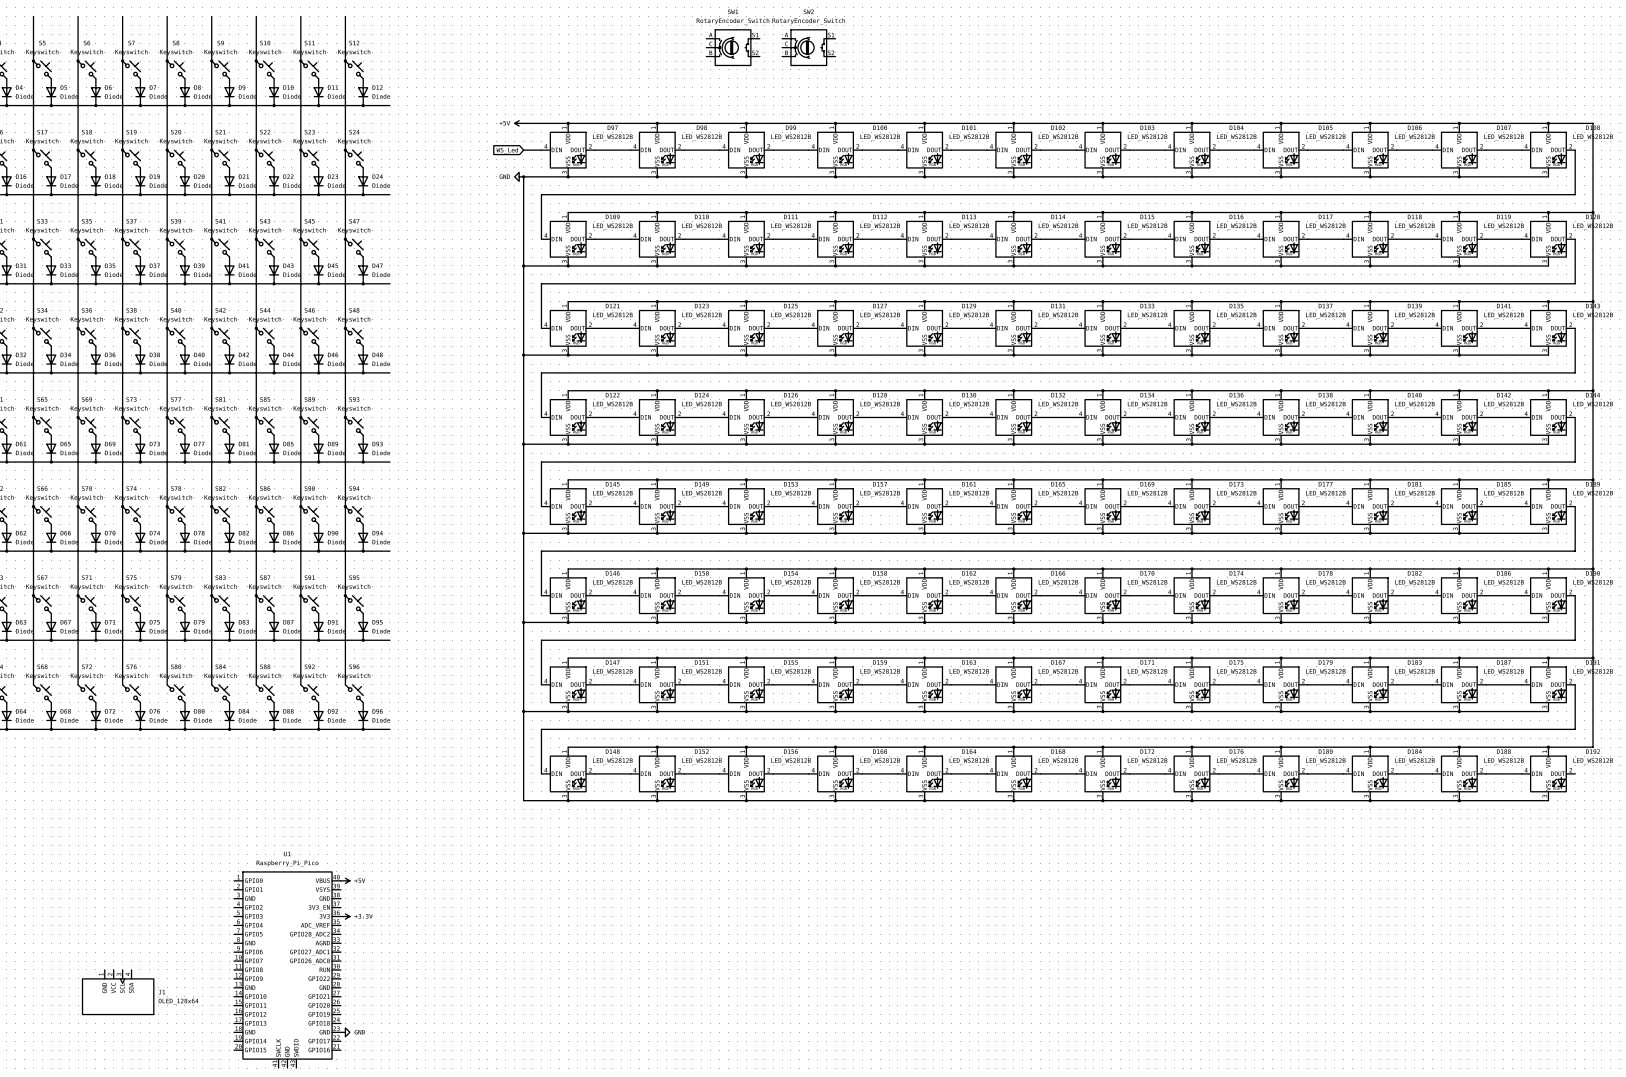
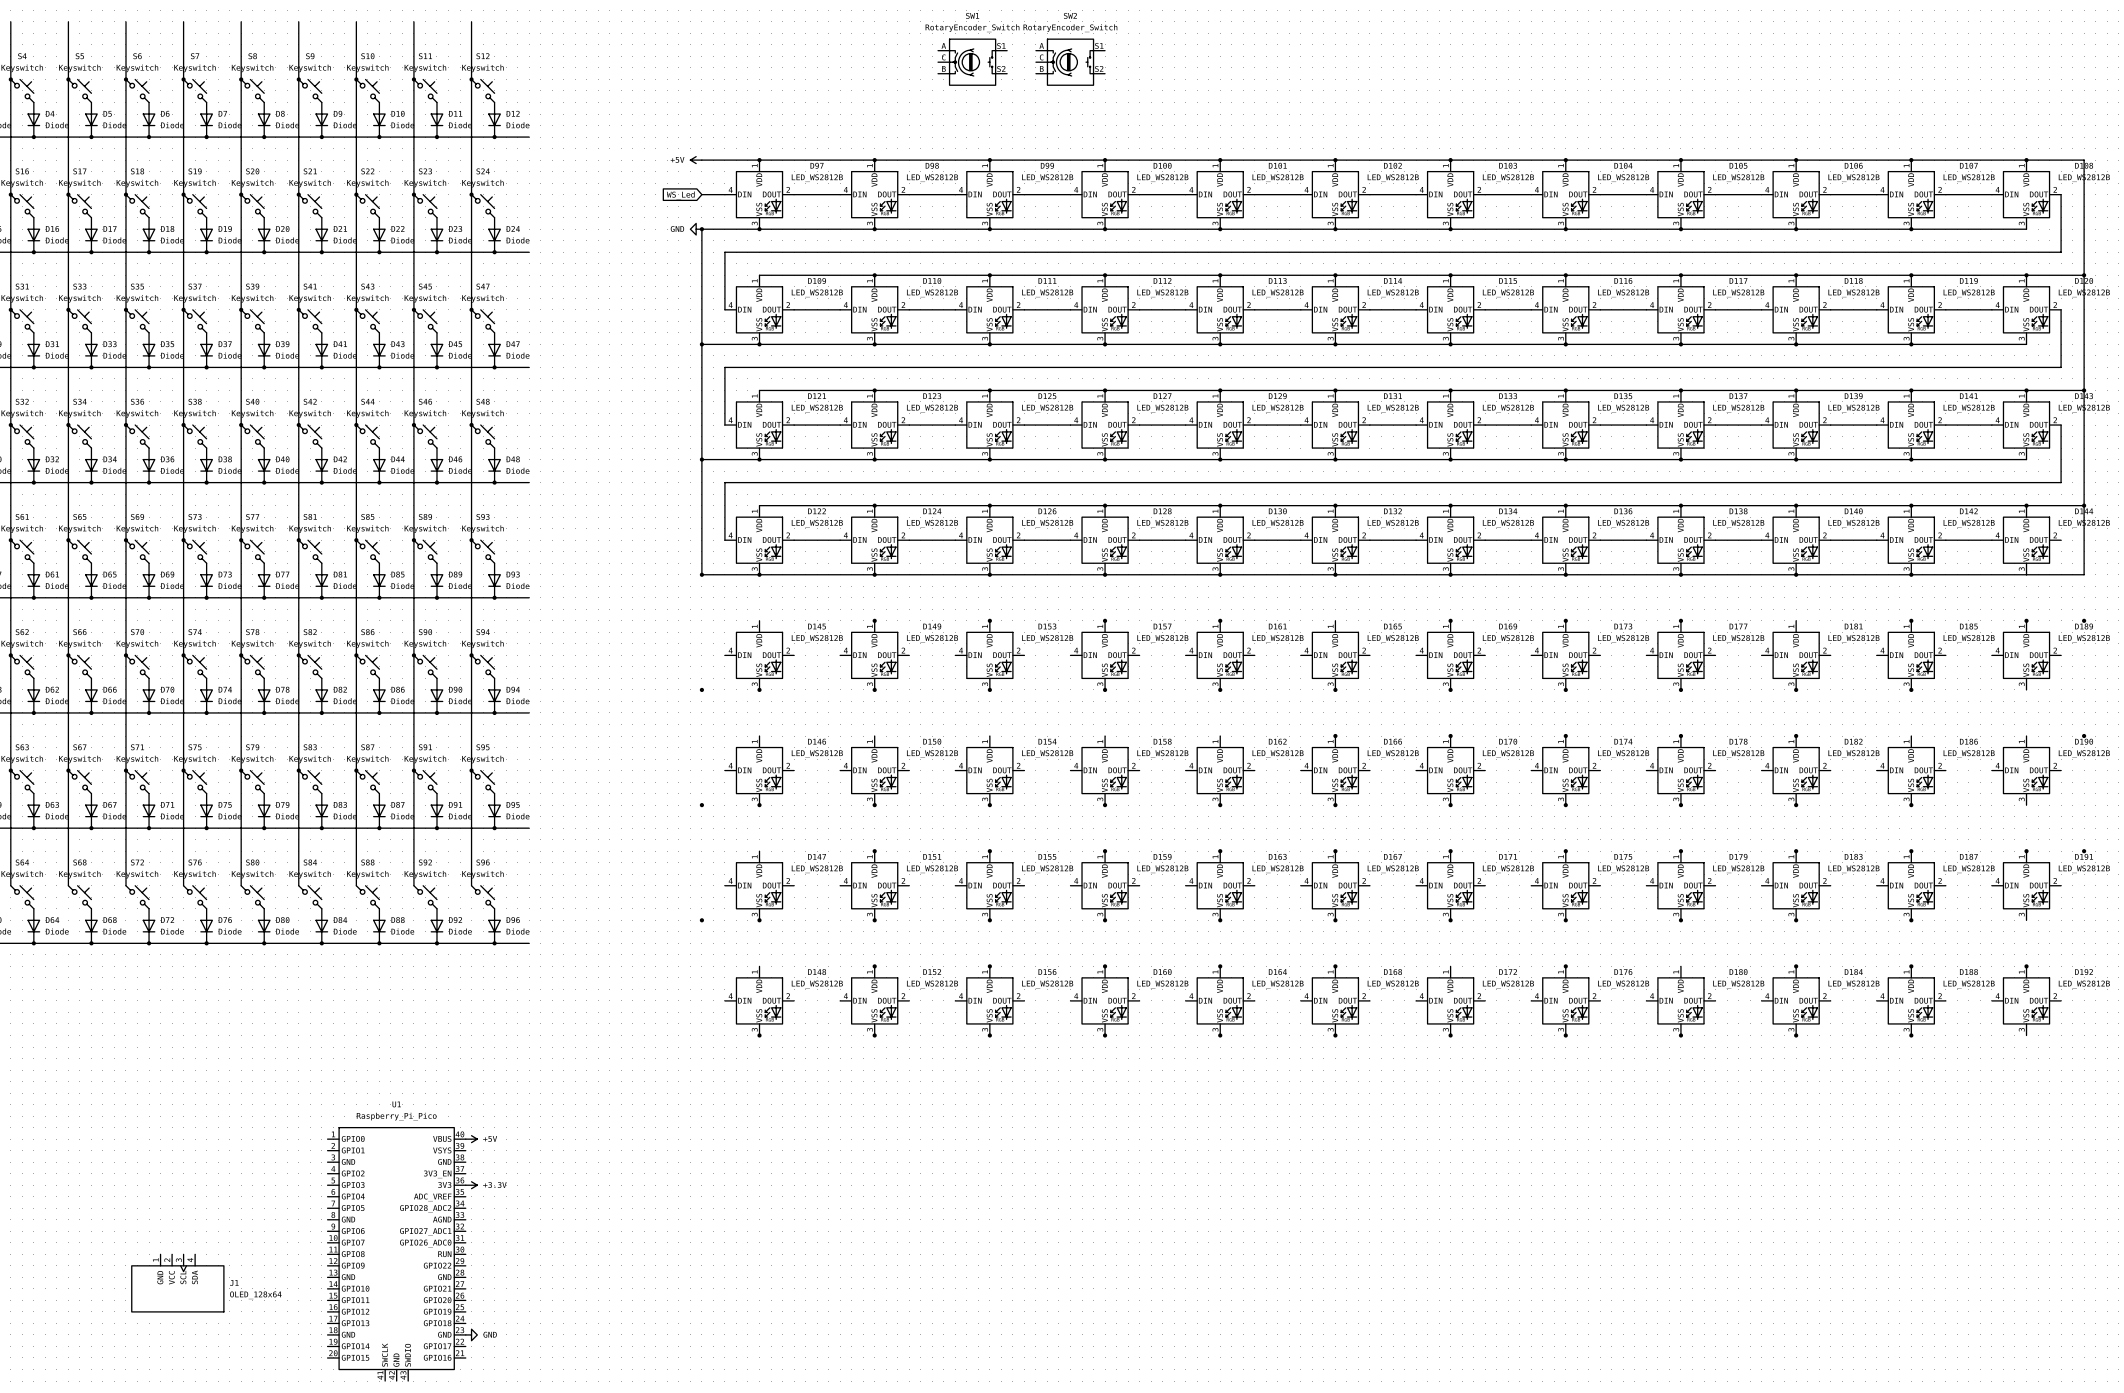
wire: (1575, 417) (1575, 462) (541, 462) (541, 506) -> none
wire: (523, 444) (523, 800) (1548, 800) -> none
wire: (1593, 444) (1593, 747) (568, 747) -> (2084, 574) (2026, 574)
wire: (568, 479) (1593, 479) -> none
junction: (1013, 479) -> none
junction: (1370, 479) -> none
wire: (594, 506) (630, 506) -> none
wire: (684, 506) (719, 506) -> none
wire: (773, 506) (808, 506) -> none
wire: (862, 506) (897, 506) -> none
wire: (951, 506) (987, 506) -> none
wire: (1040, 506) (1076, 506) -> none
wire: (1129, 506) (1165, 506) -> none
wire: (1218, 506) (1254, 506) -> none
wire: (1307, 506) (1343, 506) -> none
wire: (1396, 506) (1432, 506) -> none
wire: (1486, 506) (1521, 506) -> none
wire: (1575, 506) (1575, 551) (541, 551) (541, 595) -> none
wire: (523, 533) (1548, 533) -> none
wire: (568, 568) (1593, 568) -> none
junction: (657, 568) -> none
junction: (746, 568) -> none
junction: (835, 568) -> none
junction: (924, 568) -> none
junction: (1459, 568) -> none
junction: (1548, 568) -> none
wire: (594, 595) (630, 595) -> none
wire: (684, 595) (719, 595) -> none
wire: (773, 595) (808, 595) -> none
wire: (862, 595) (897, 595) -> none
wire: (951, 595) (987, 595) -> none
wire: (1040, 595) (1076, 595) -> none
wire: (1129, 595) (1165, 595) -> none
wire: (1218, 595) (1254, 595) -> none
wire: (1307, 595) (1343, 595) -> none
wire: (1396, 595) (1432, 595) -> none
wire: (1486, 595) (1521, 595) -> none
wire: (1575, 595) (1575, 640) (541, 640) (541, 684) -> none
wire: (523, 622) (1548, 622) -> none
wire: (568, 658) (1593, 658) -> none
wire: (594, 684) (630, 684) -> none
wire: (684, 684) (719, 684) -> none
wire: (773, 684) (808, 684) -> none
wire: (862, 684) (897, 684) -> none
wire: (951, 684) (987, 684) -> none
wire: (1040, 684) (1076, 684) -> none
wire: (1129, 684) (1165, 684) -> none
wire: (1218, 684) (1254, 684) -> none
wire: (1307, 684) (1343, 684) -> none
wire: (1396, 684) (1432, 684) -> none
wire: (1486, 684) (1521, 684) -> none
wire: (1575, 684) (1575, 729) (541, 729) (541, 773) -> none
wire: (523, 711) (1548, 711) -> none
junction: (1102, 747) -> none
junction: (1281, 747) -> none
wire: (594, 773) (630, 773) -> none
wire: (684, 773) (719, 773) -> none
wire: (773, 773) (808, 773) -> none
wire: (862, 773) (897, 773) -> none
wire: (951, 773) (987, 773) -> none
wire: (1040, 773) (1076, 773) -> none
wire: (1129, 773) (1165, 773) -> none
wire: (1218, 773) (1254, 773) -> none
wire: (1307, 773) (1343, 773) -> none
wire: (1396, 773) (1432, 773) -> none
wire: (1486, 773) (1521, 773) -> none

